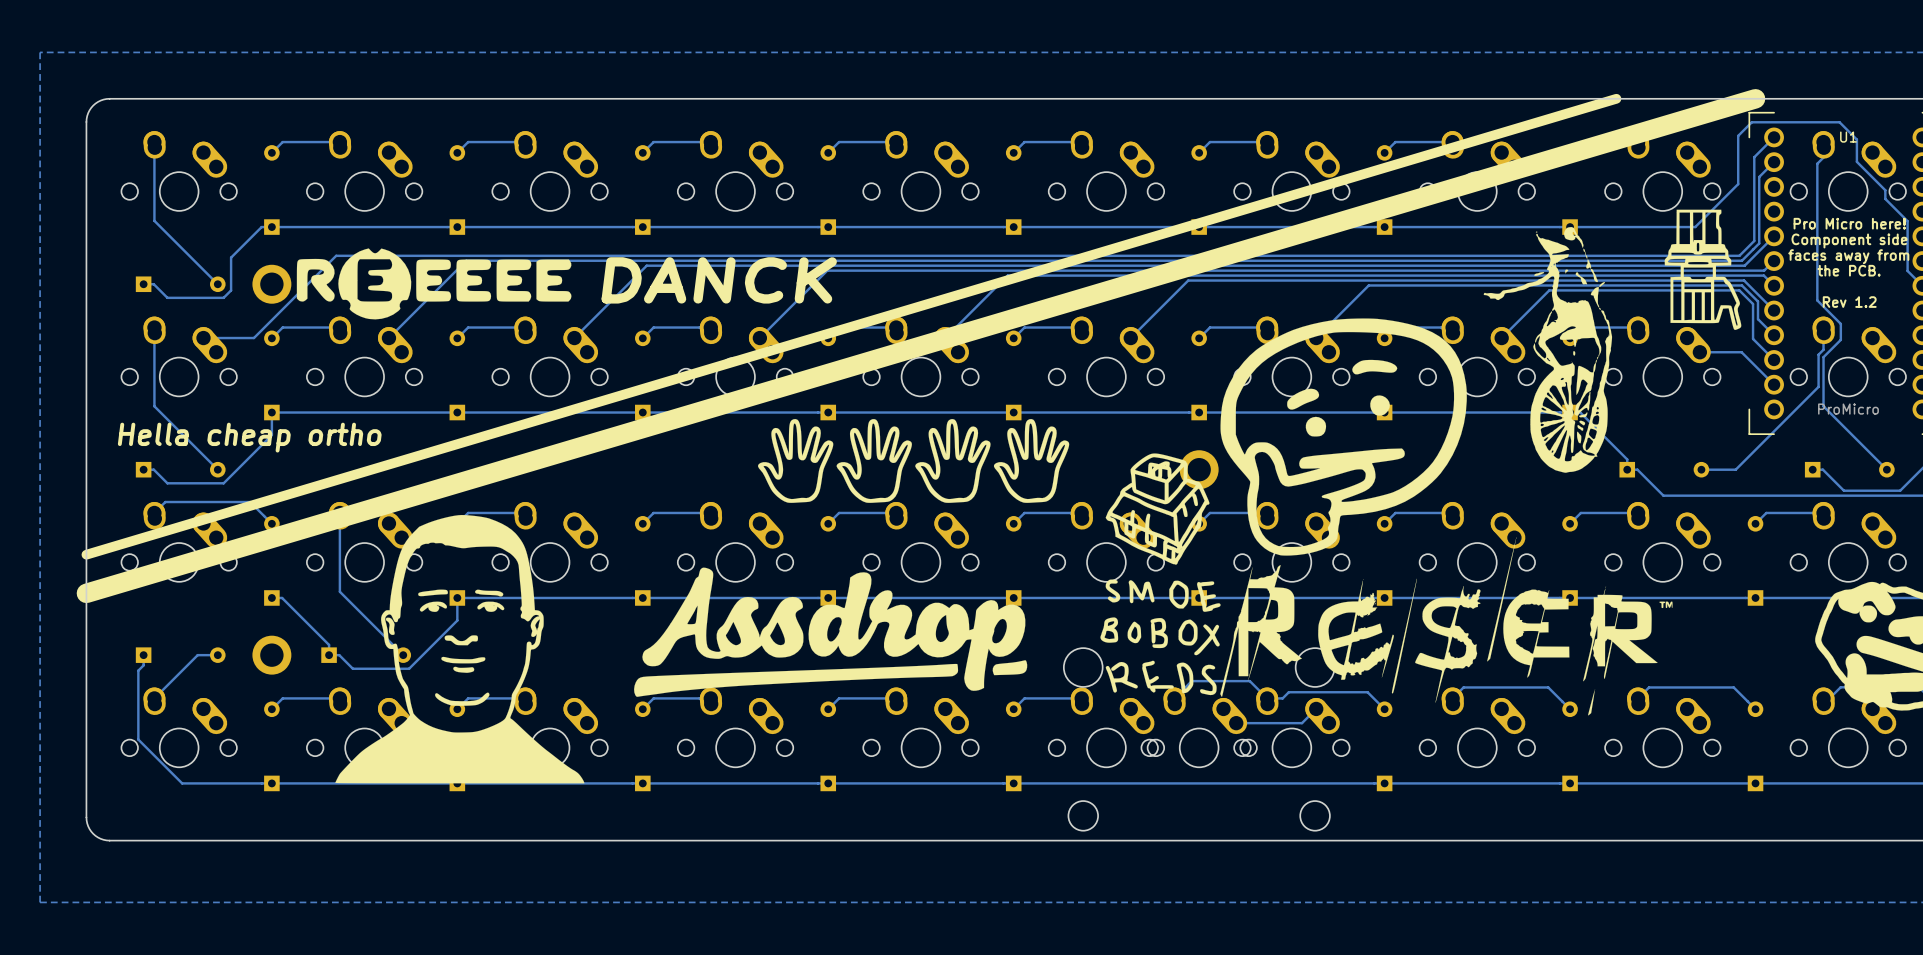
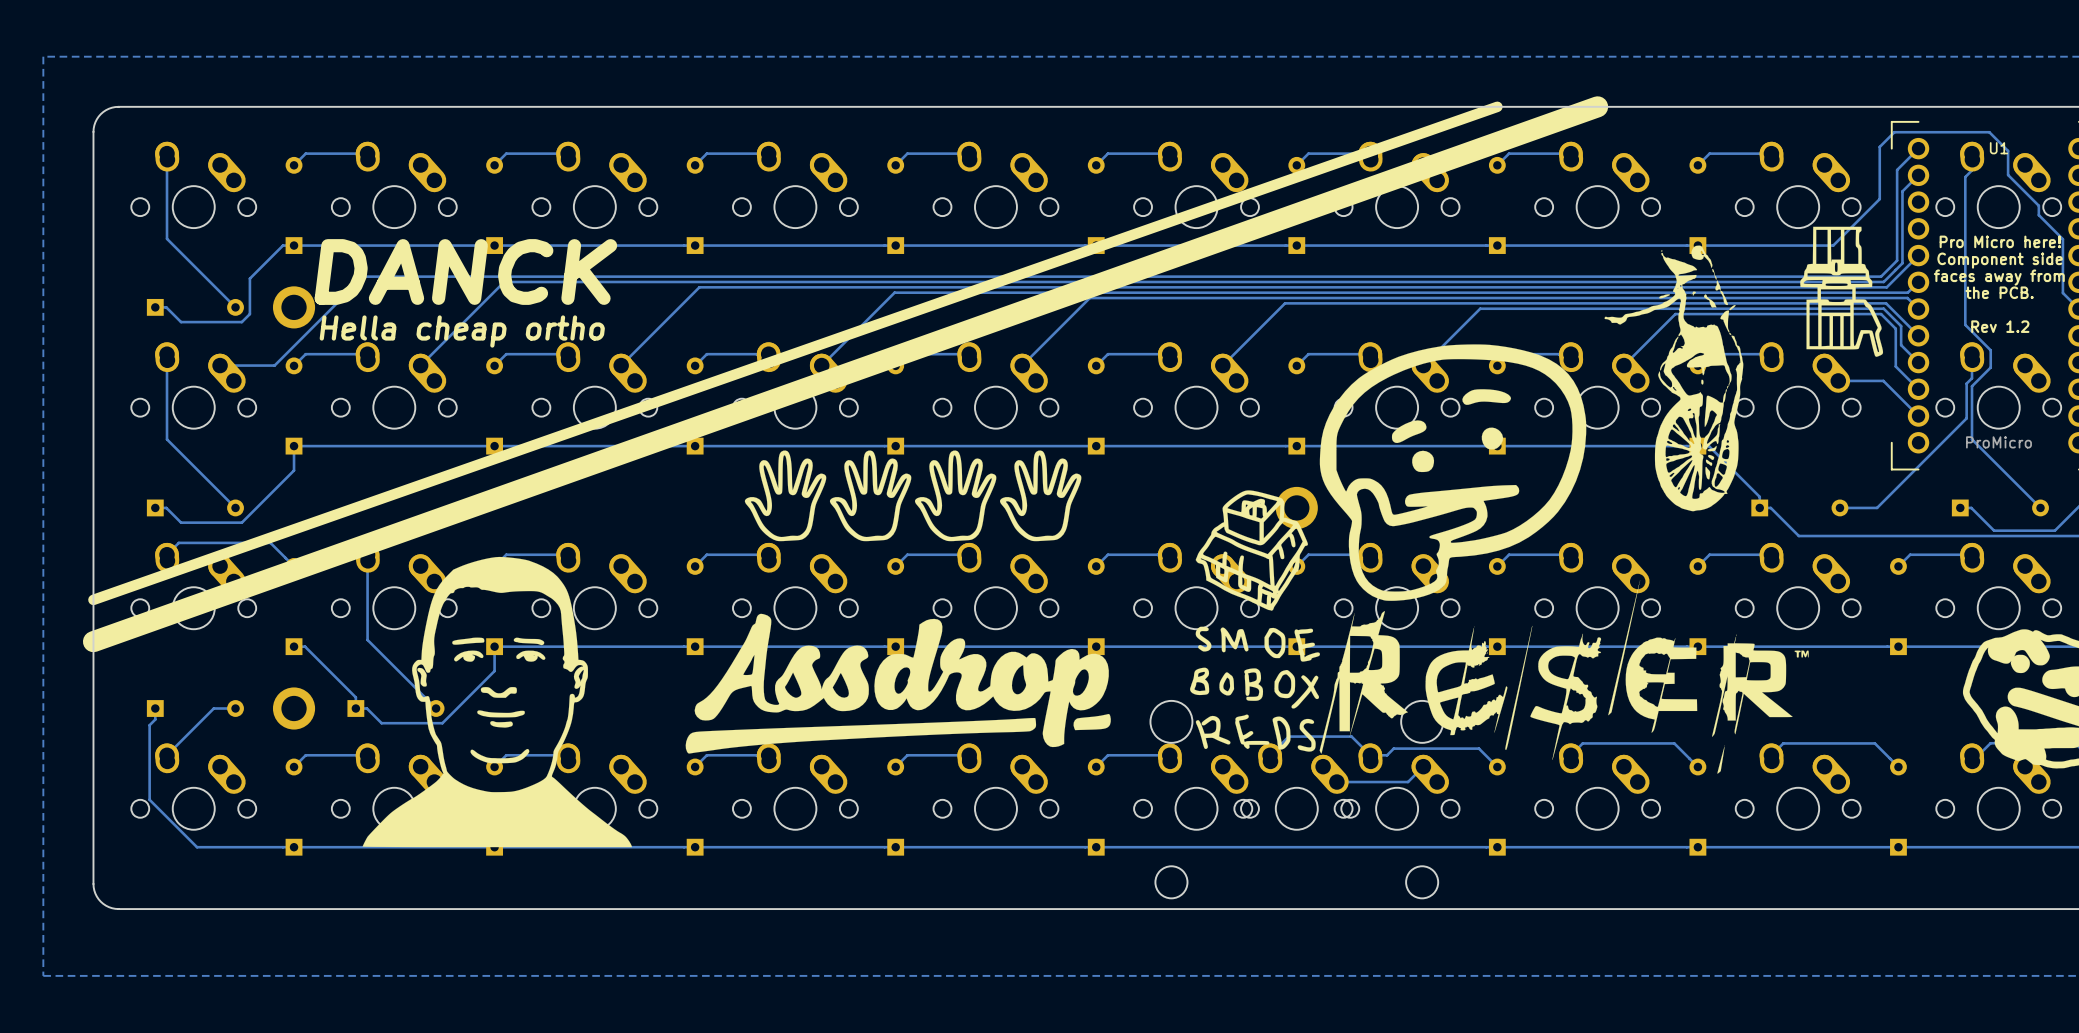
line: (1616, 98) (86, 554) -> (1497, 106) (93, 599)
line: (1755, 98) (86, 593) -> (1597, 106) (93, 641)
drawing: [296, 248, 572, 320] -> none
text: none -> DANCK (465, 272)
text: DANCK (719, 280) -> none
text position: Hella cheap ortho (249, 437) -> Hella cheap ortho (462, 331)
drawing position: (913, 460) -> (913, 495)

